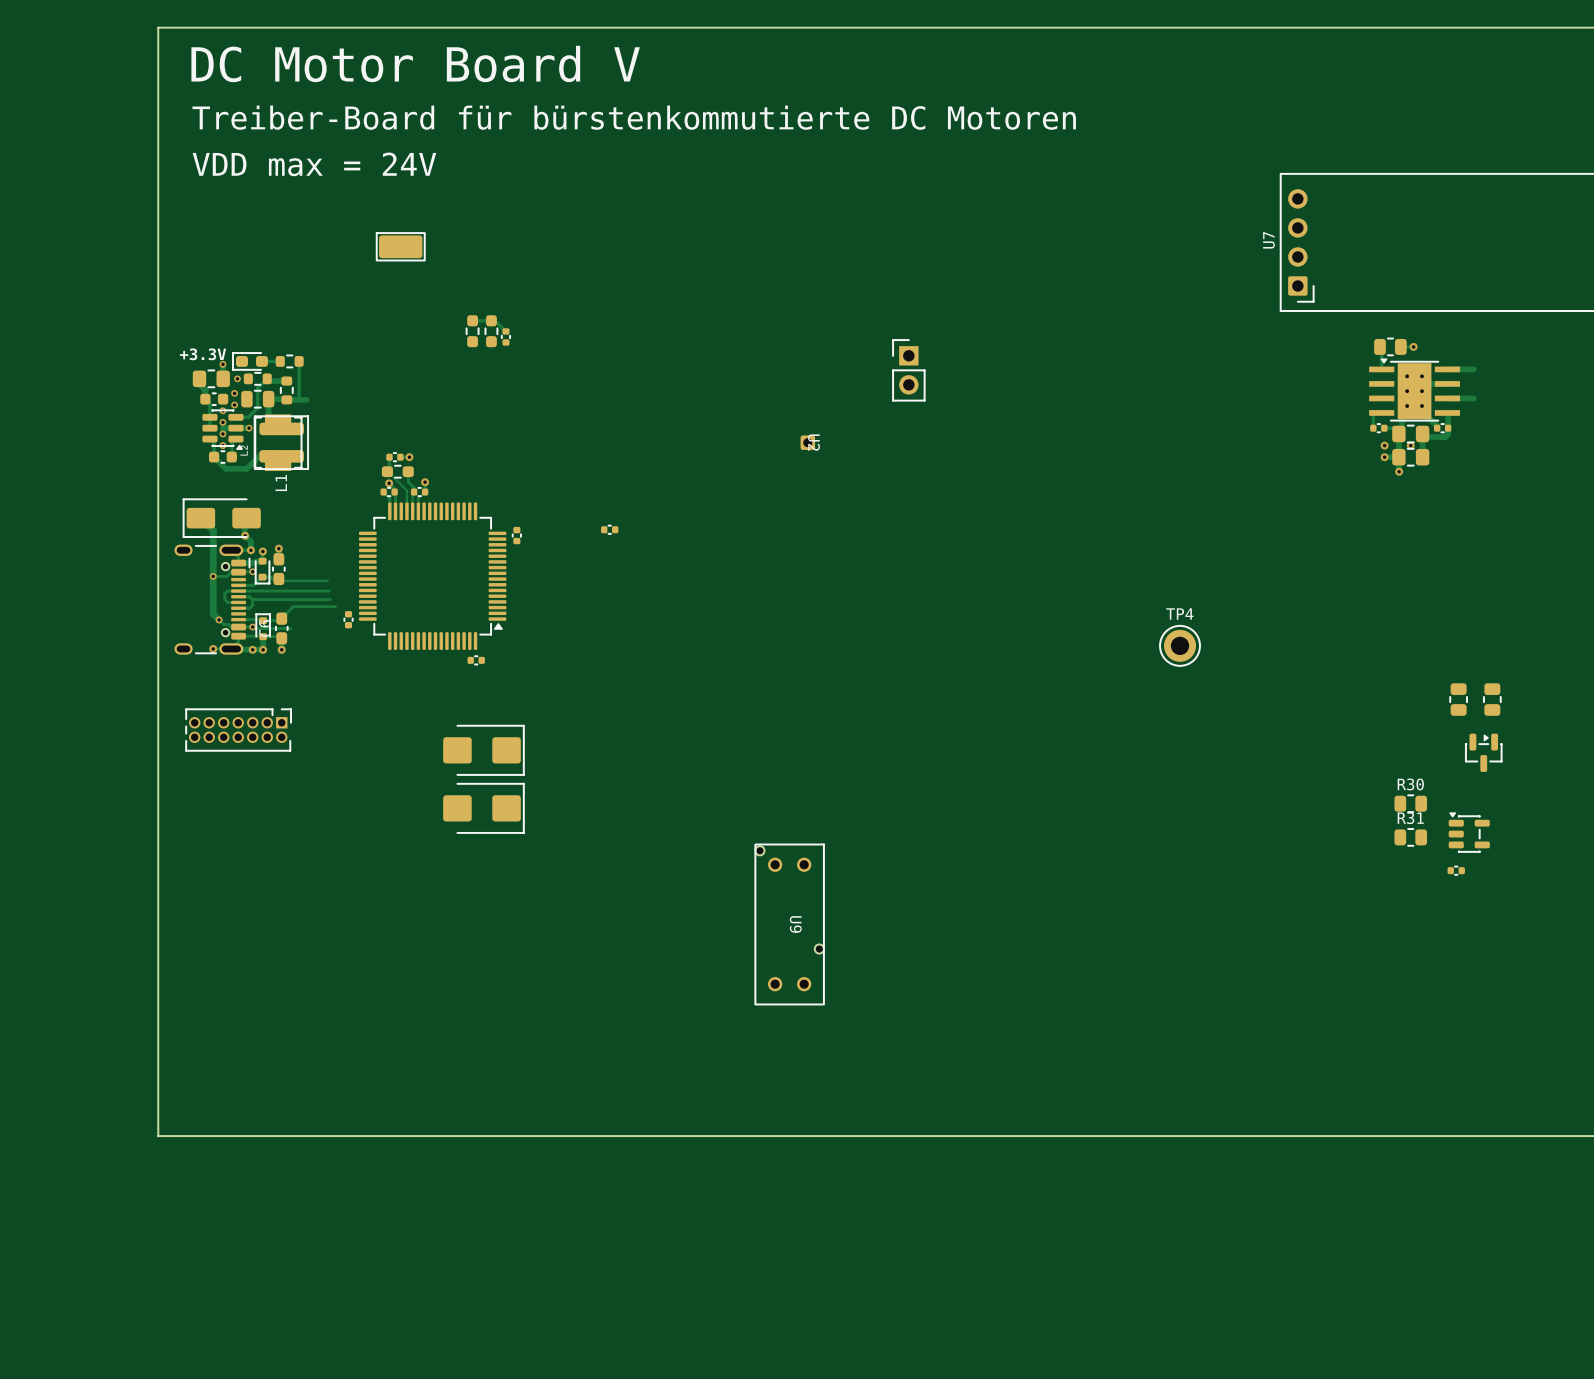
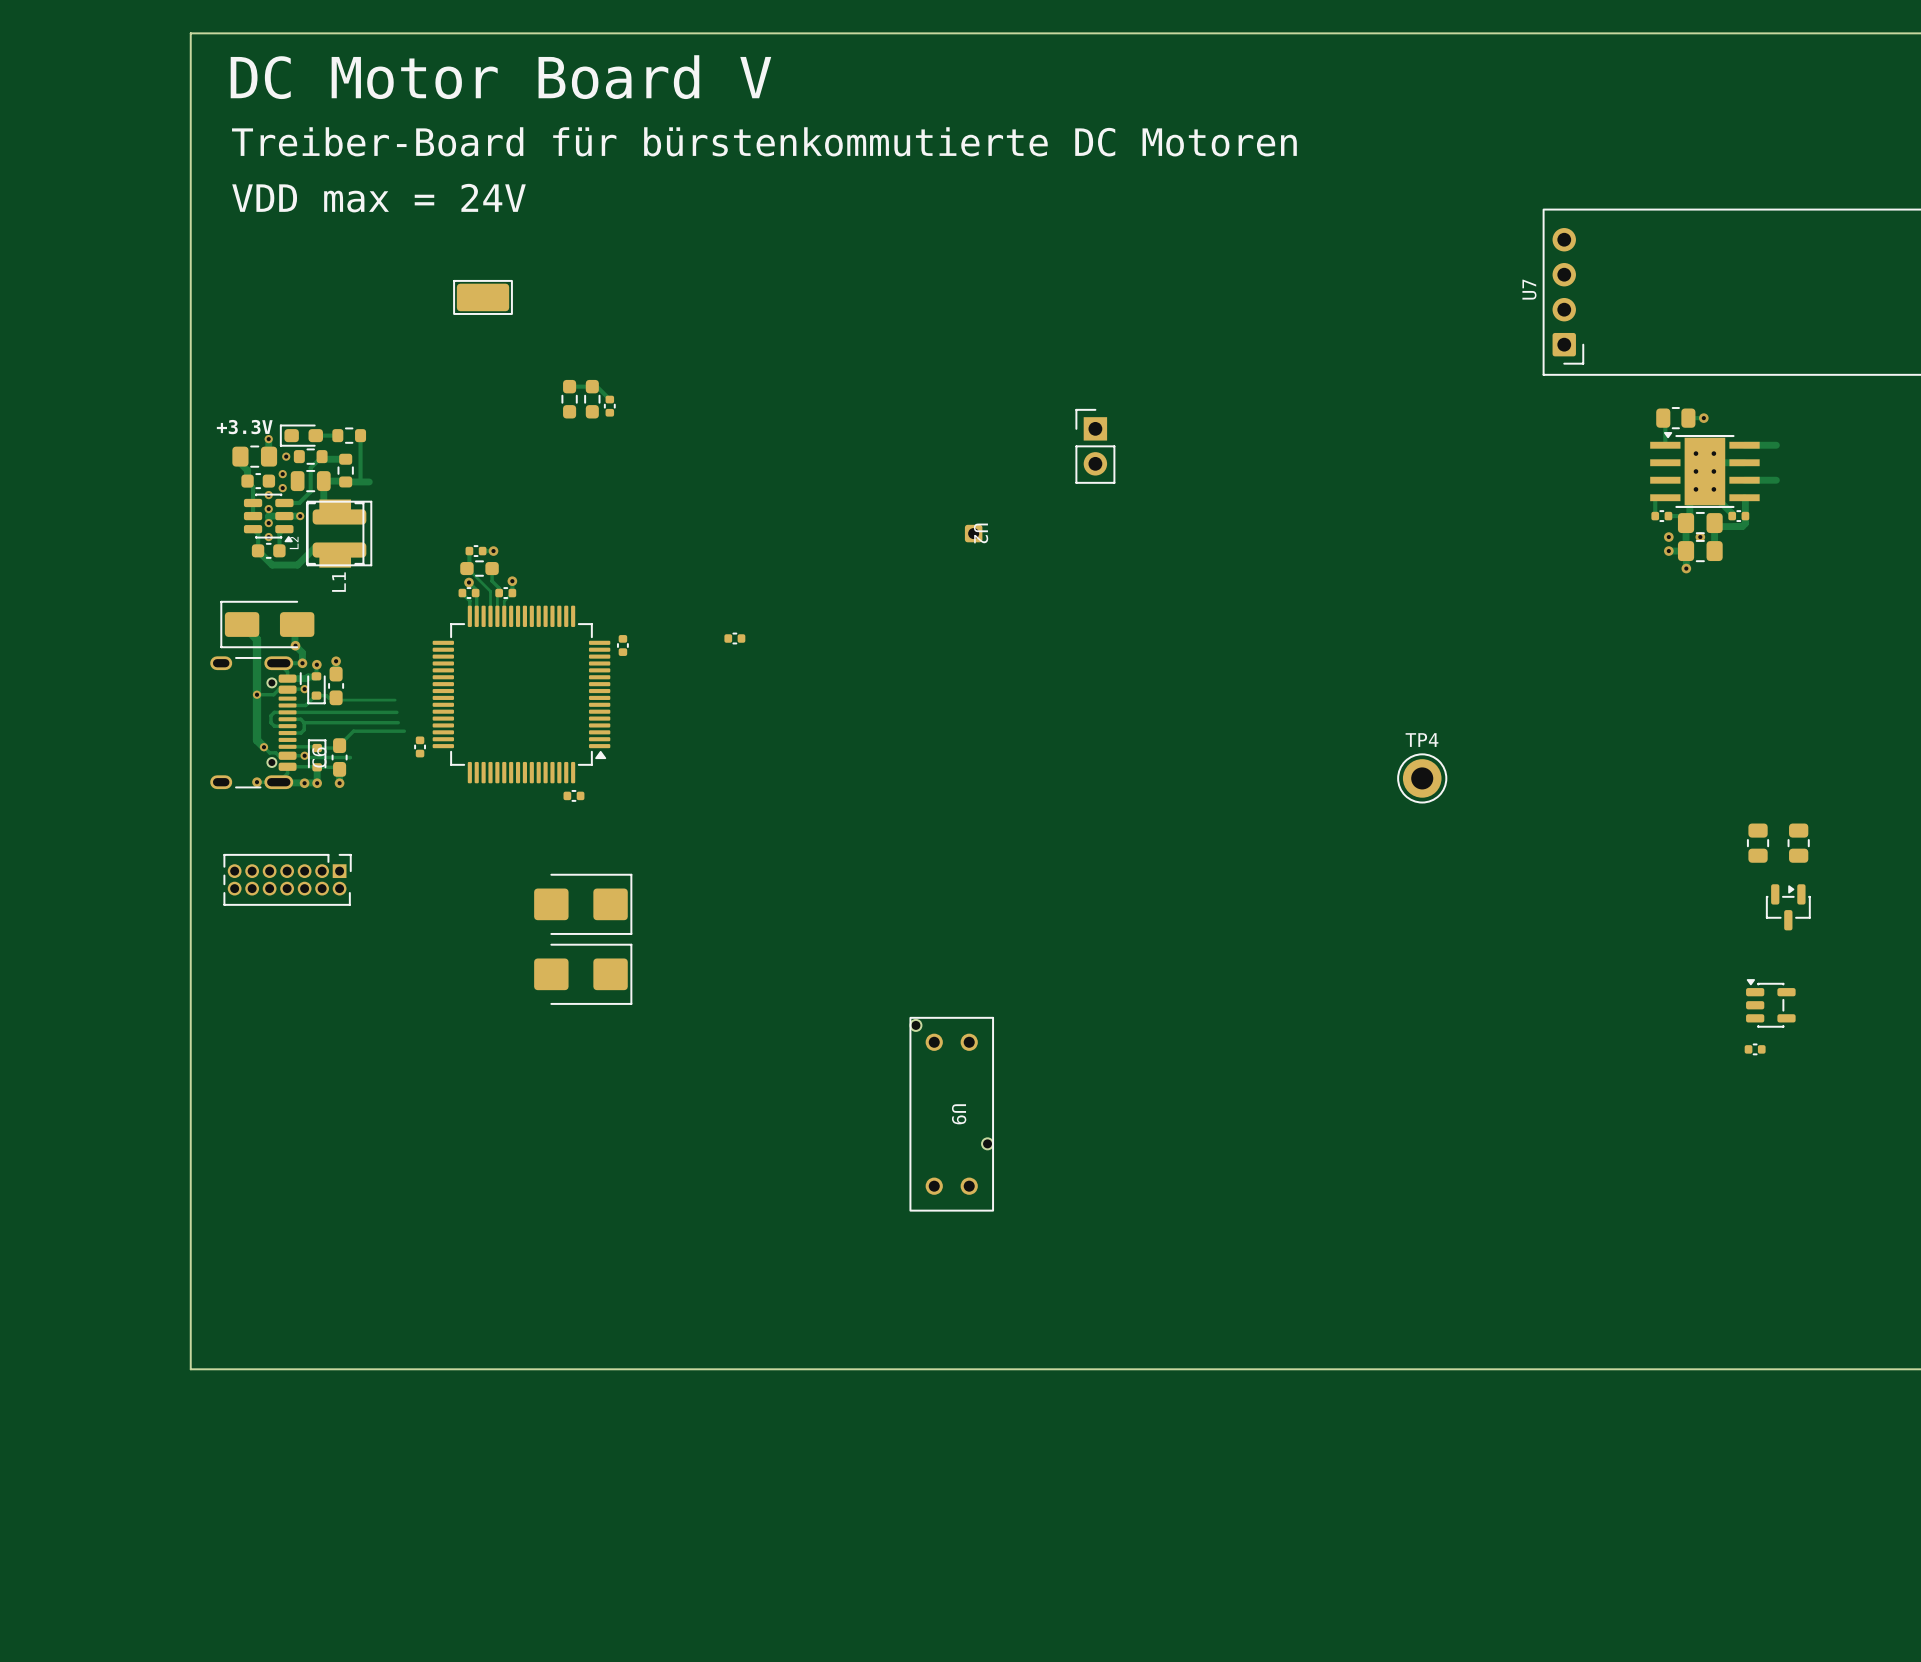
R30: (1410, 803) -> none
R31: (1410, 837) -> none

